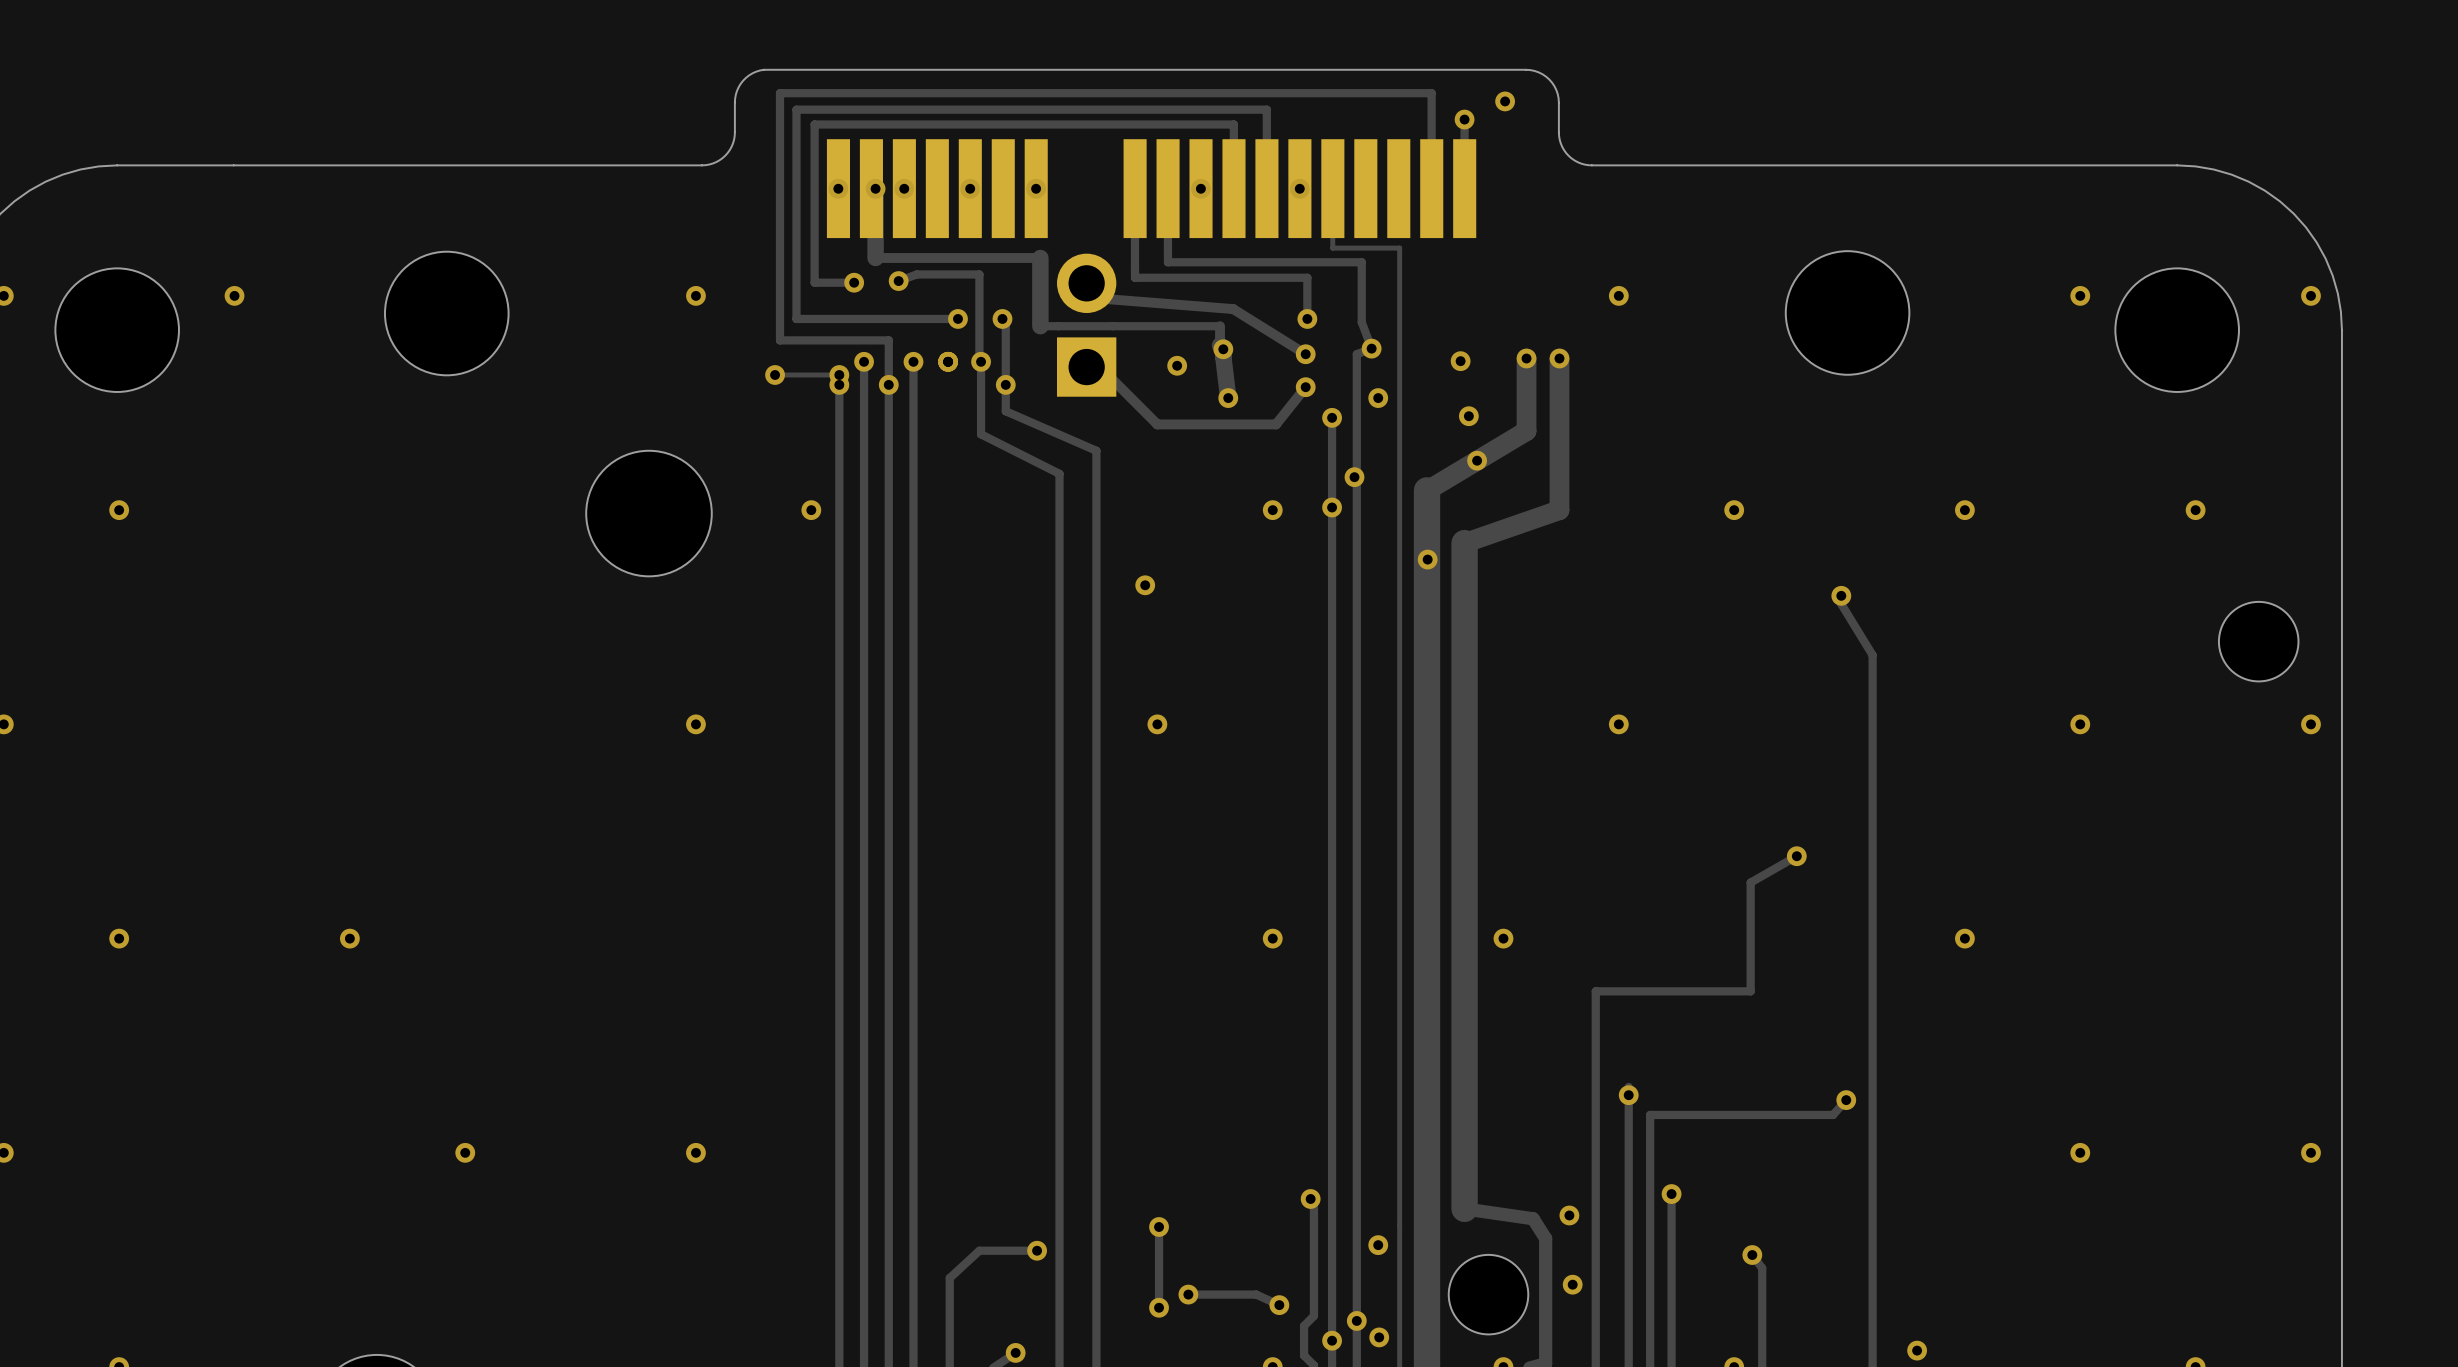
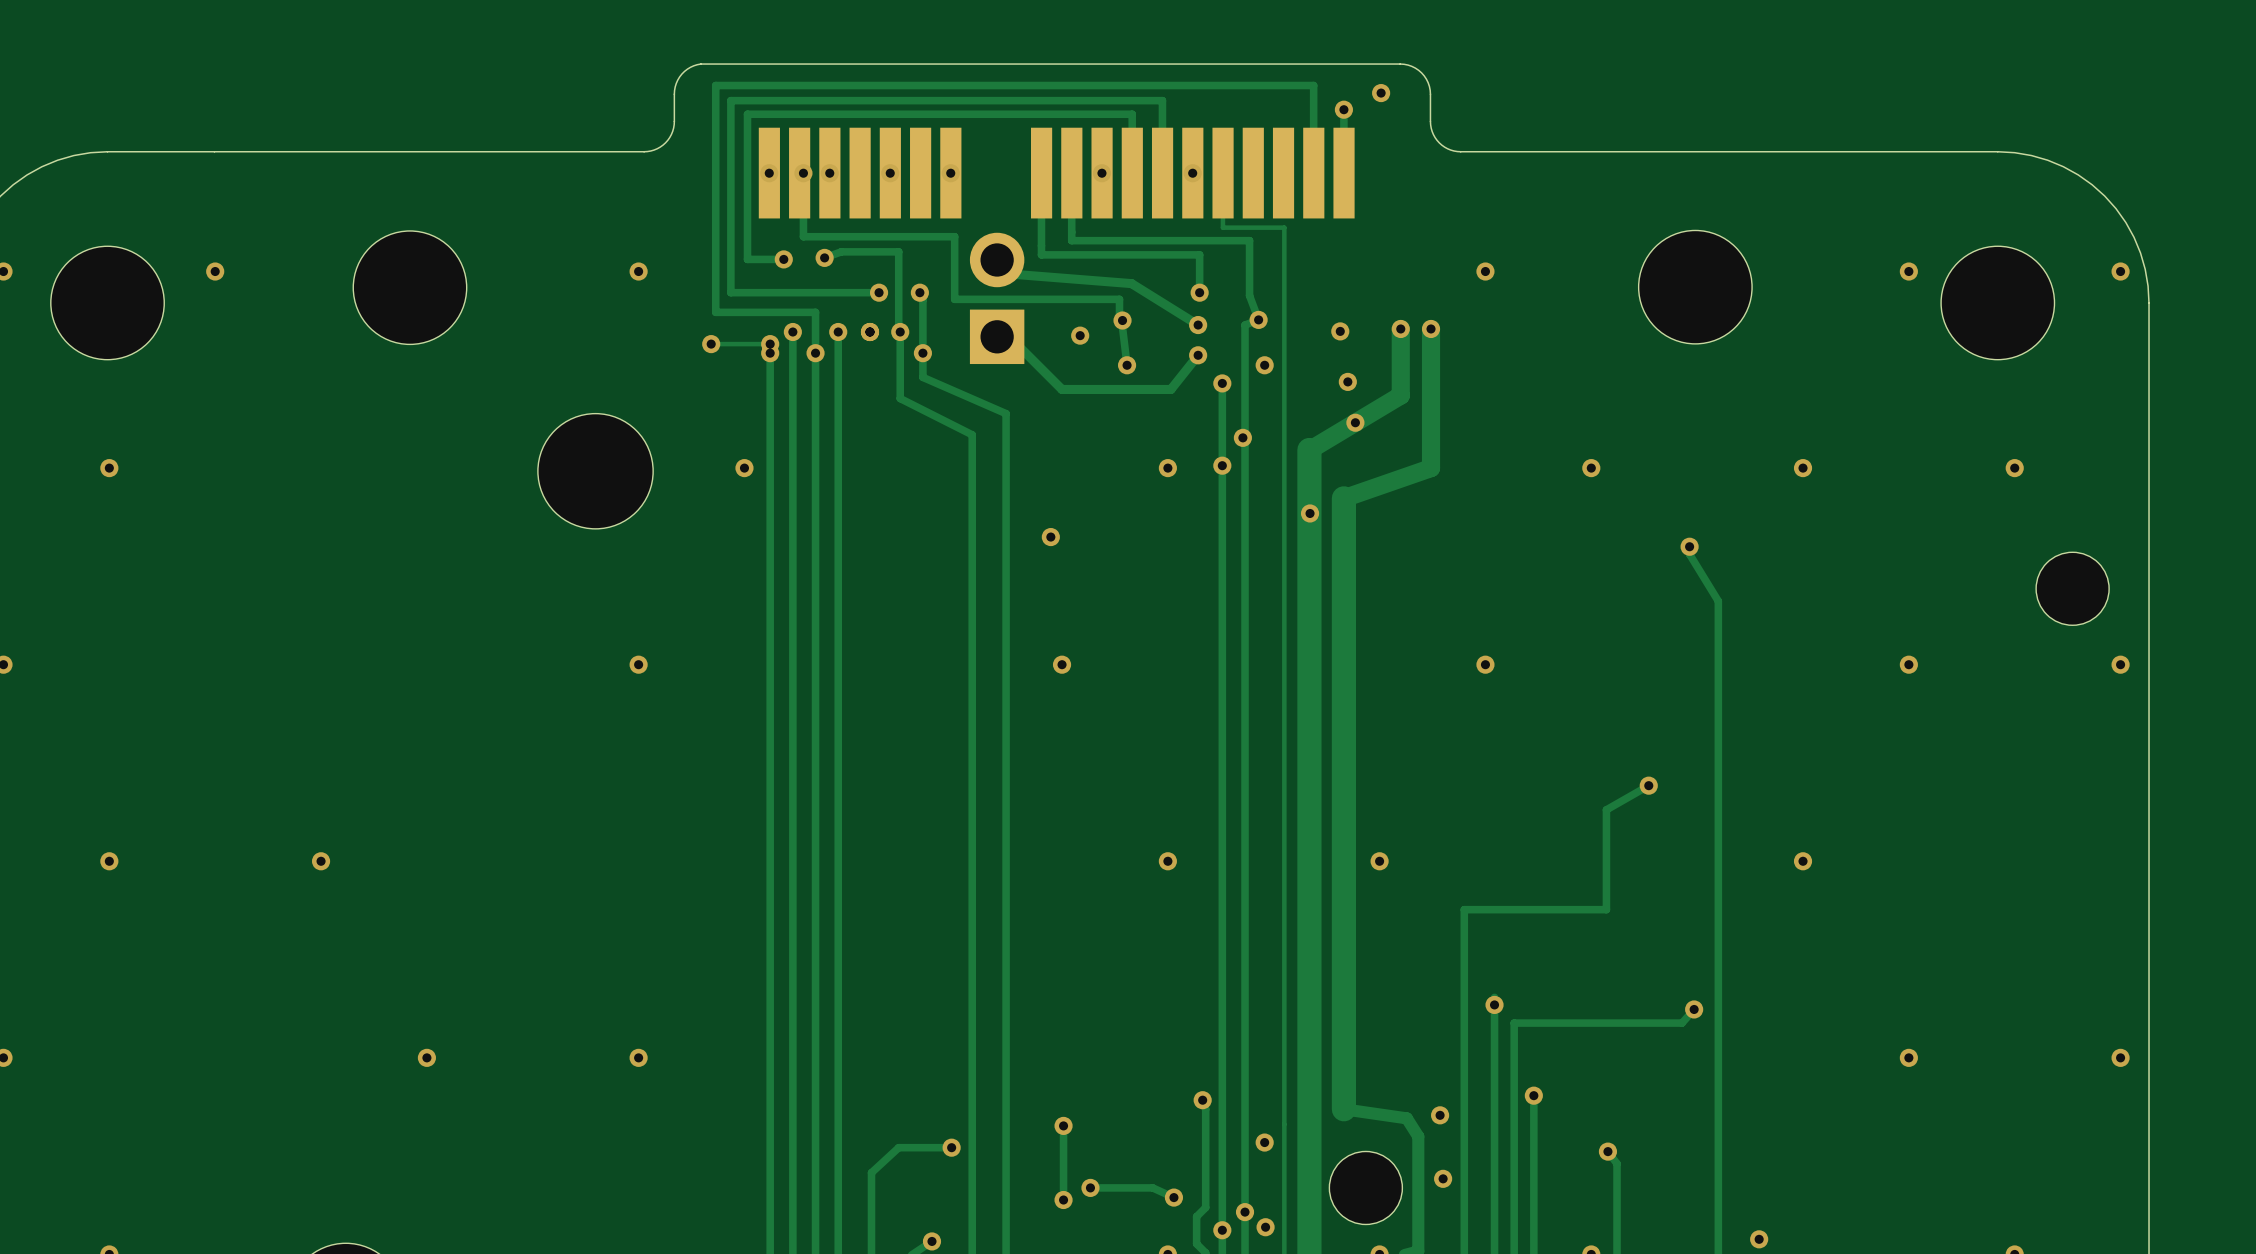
track width: thick (875, 188) (875, 257) (1040, 257) (1040, 326) -> thin (803, 173) (803, 236) (954, 236) (954, 299)
track width: thick (1220, 326) (1220, 345) (1223, 349) (1228, 398) -> thin (1119, 299) (1119, 316) (1122, 320) (1127, 365)

